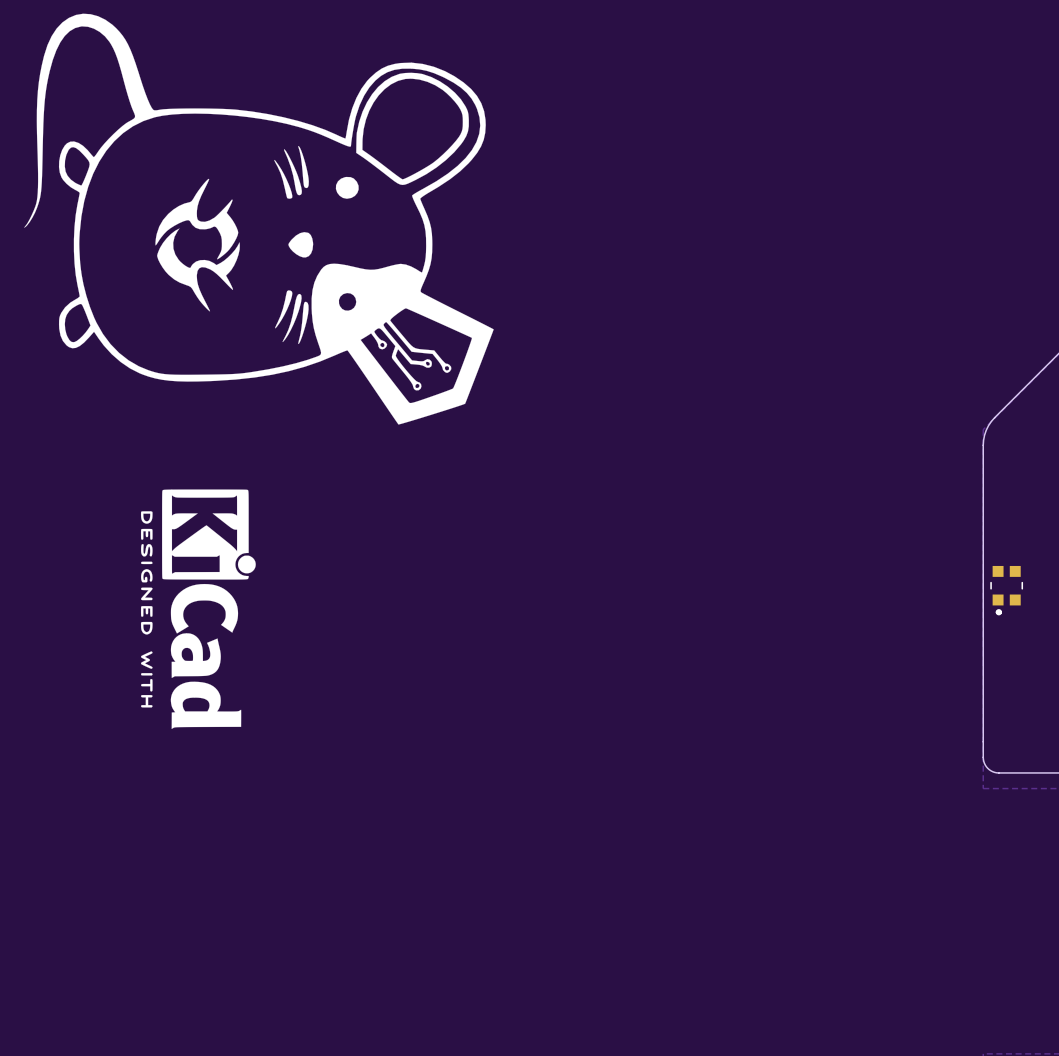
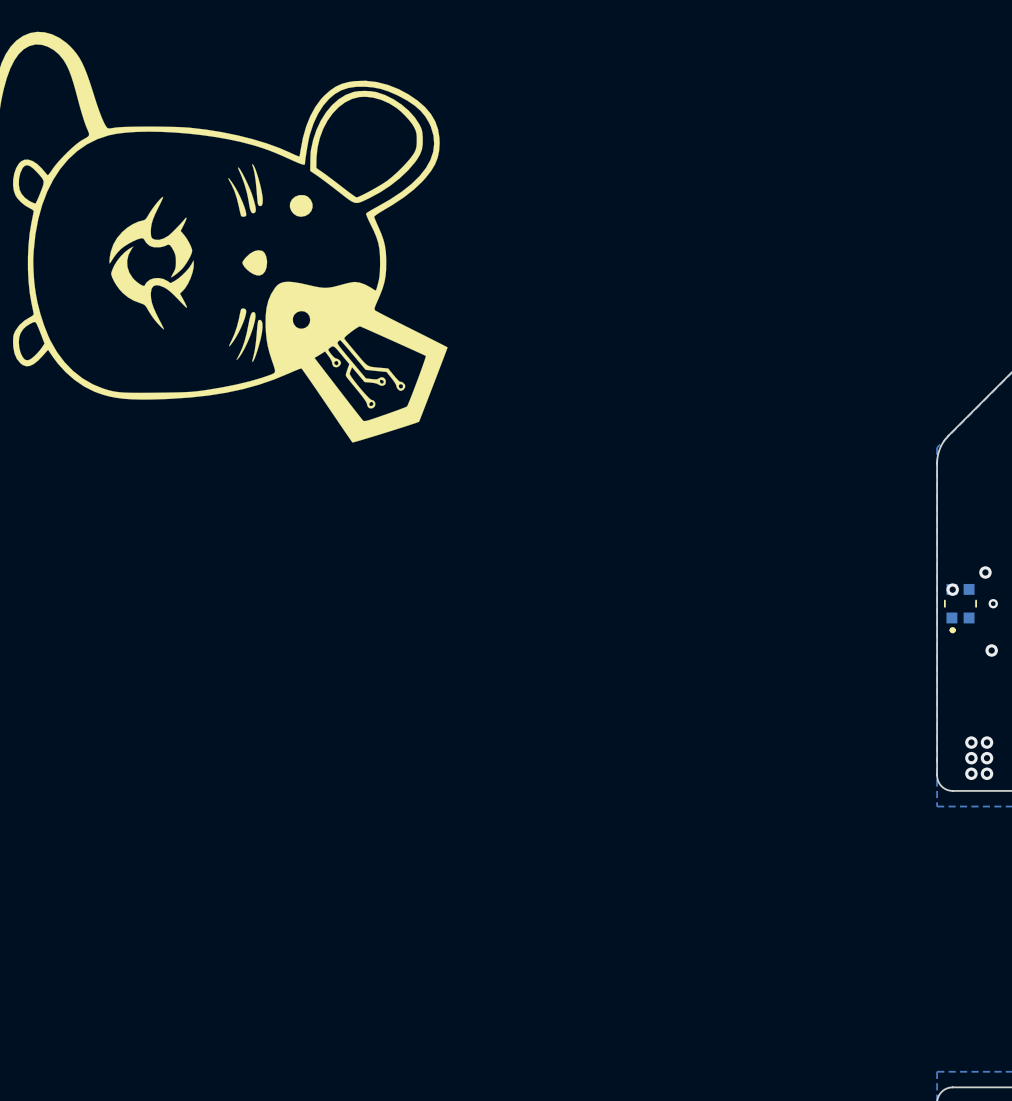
drawing: [140, 489, 256, 729] -> none
via: none -> (985, 572)
via: none -> (952, 589)
via: none -> (993, 603)
via: none -> (991, 650)
via: none -> (971, 742)
via: none -> (987, 742)
via: none -> (971, 758)
via: none -> (987, 758)
via: none -> (971, 773)
via: none -> (987, 773)

